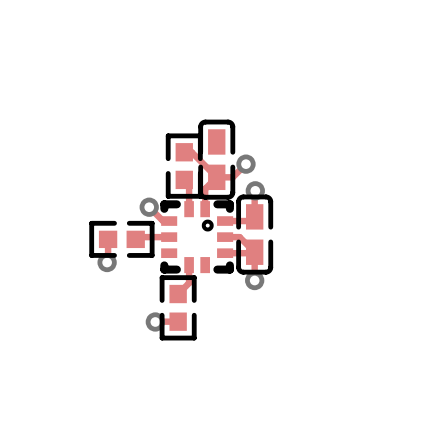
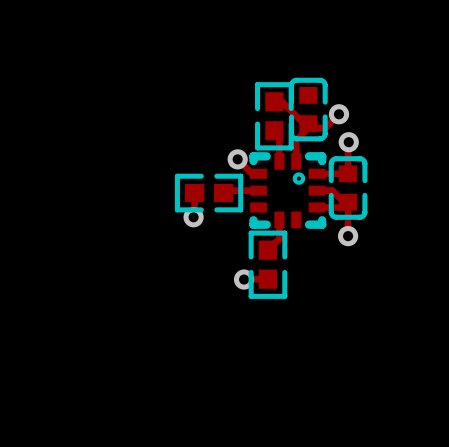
part footprint: [198, 119, 236, 200] -> [289, 77, 328, 142]
part footprint: [236, 194, 274, 275] -> [328, 156, 368, 220]

